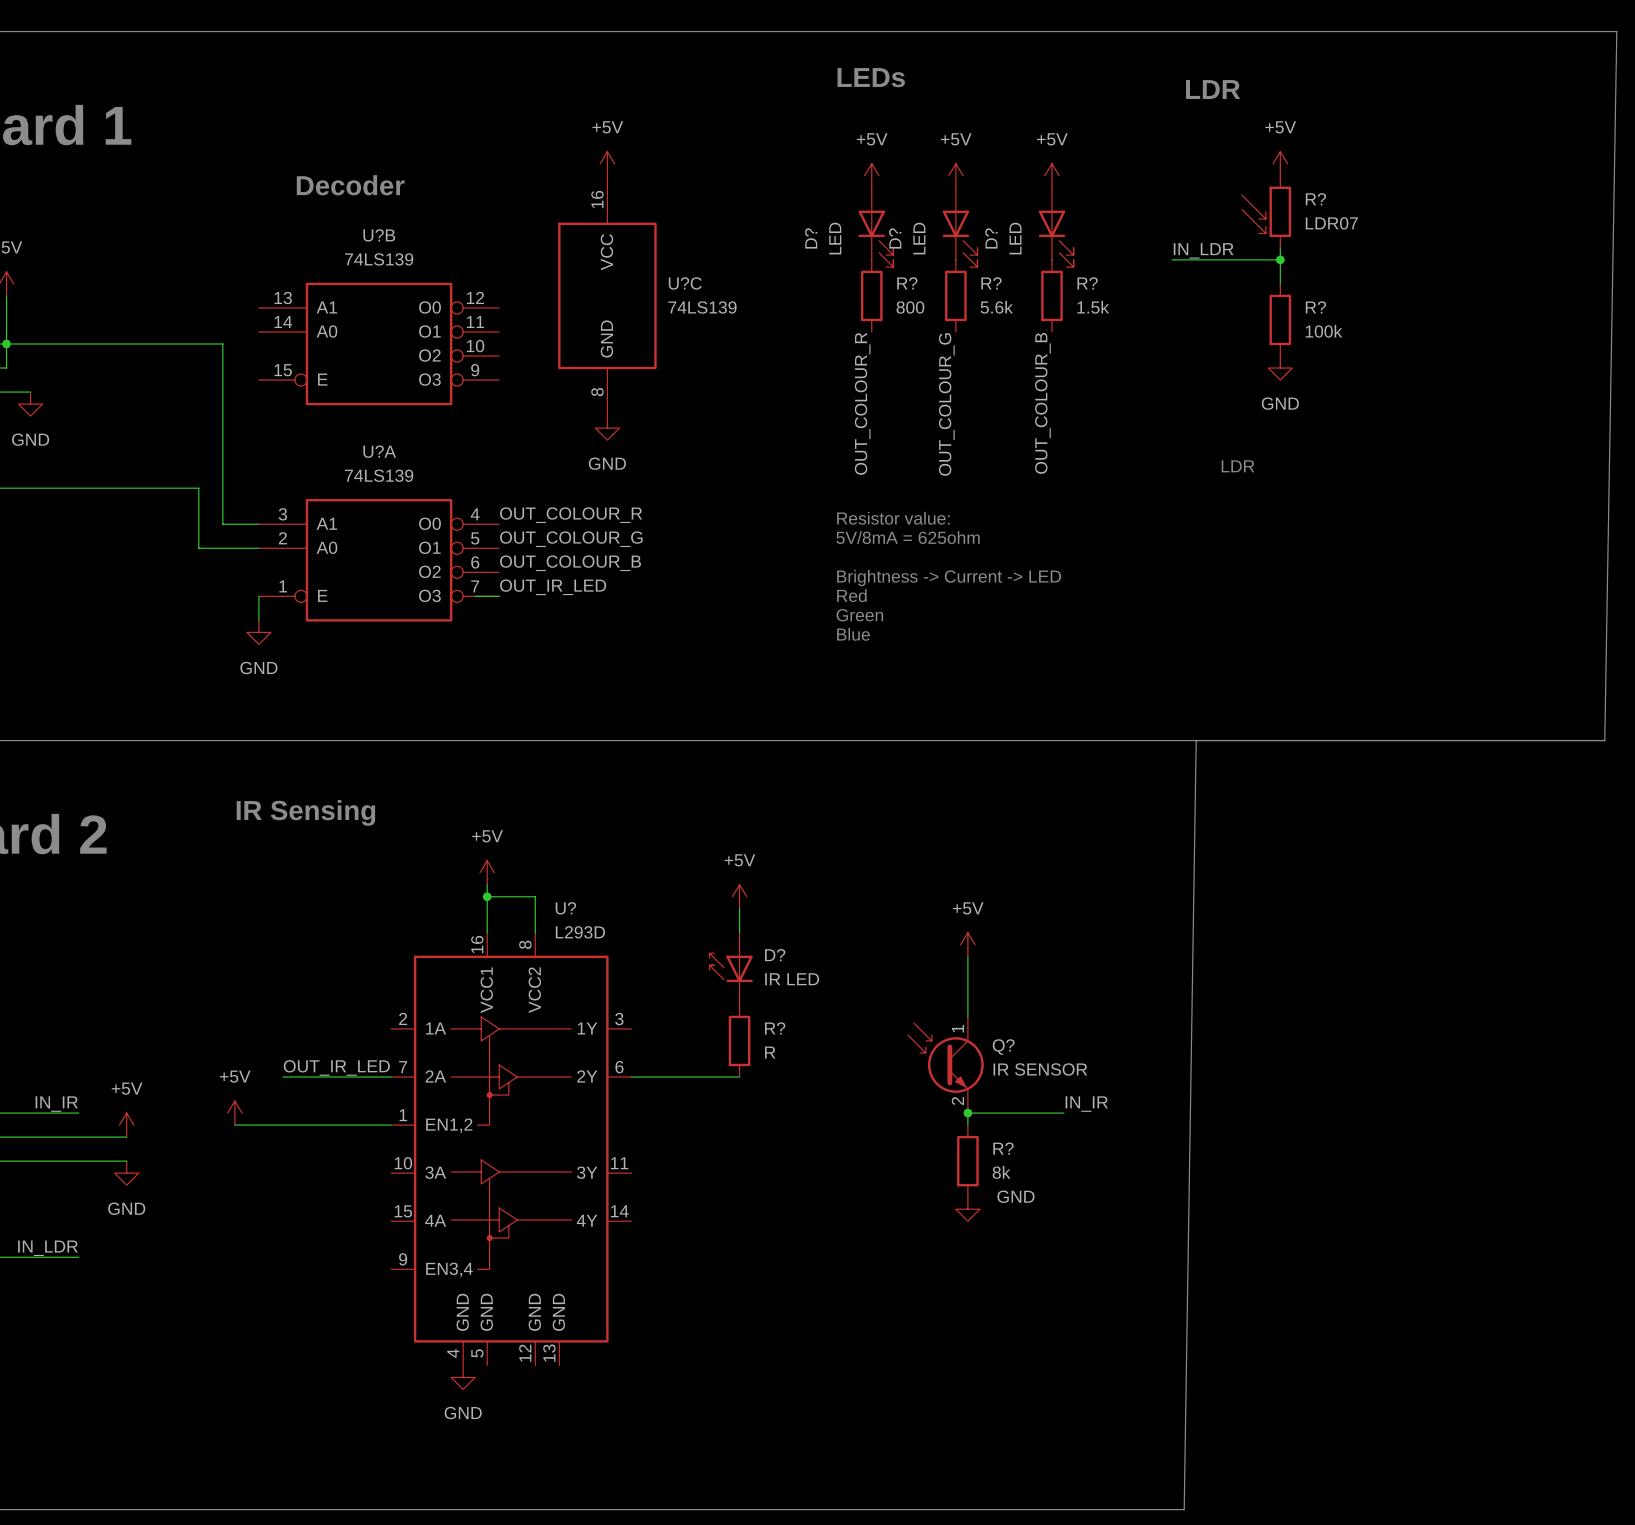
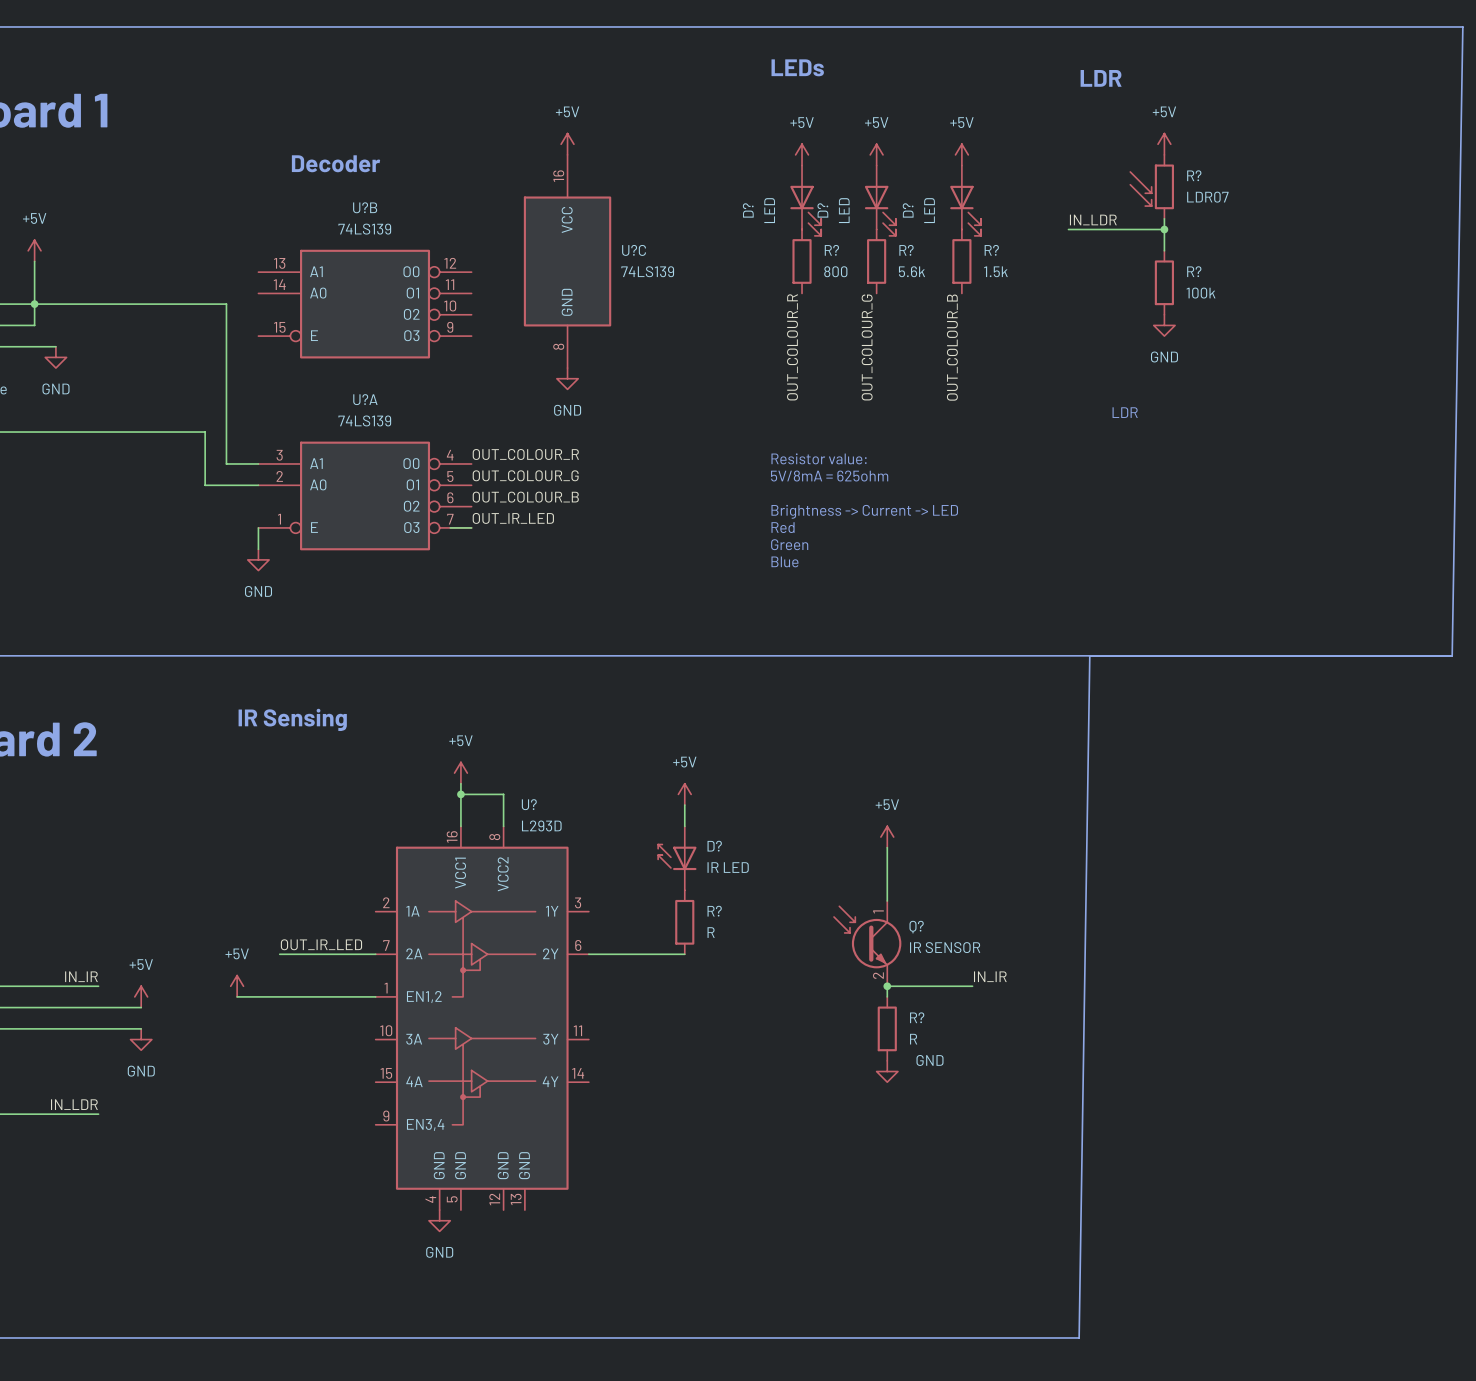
R? value: 8k (1001, 1172) -> R (913, 1039)

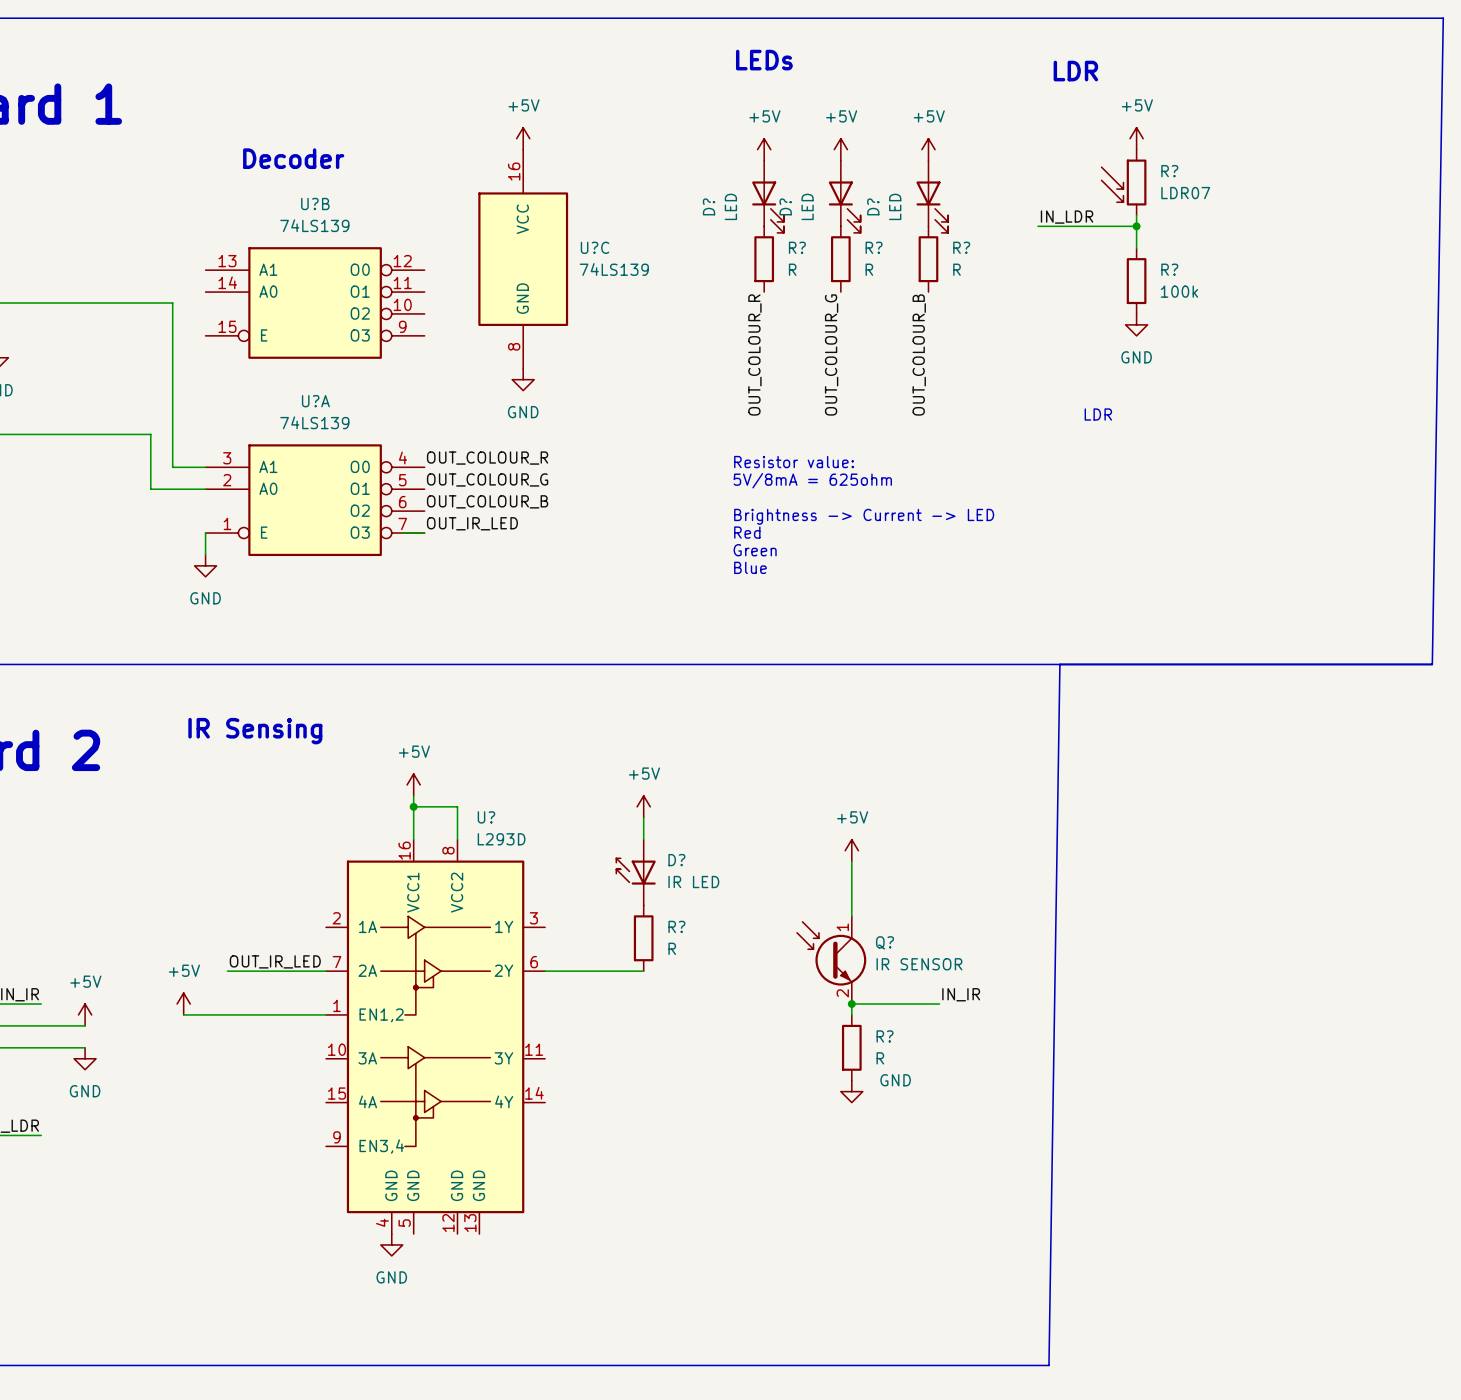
R? value: 800 (835, 271) -> R (792, 269)
R? value: 5.6k (911, 271) -> R (869, 269)
R? value: 1.5k (995, 271) -> R (956, 269)

